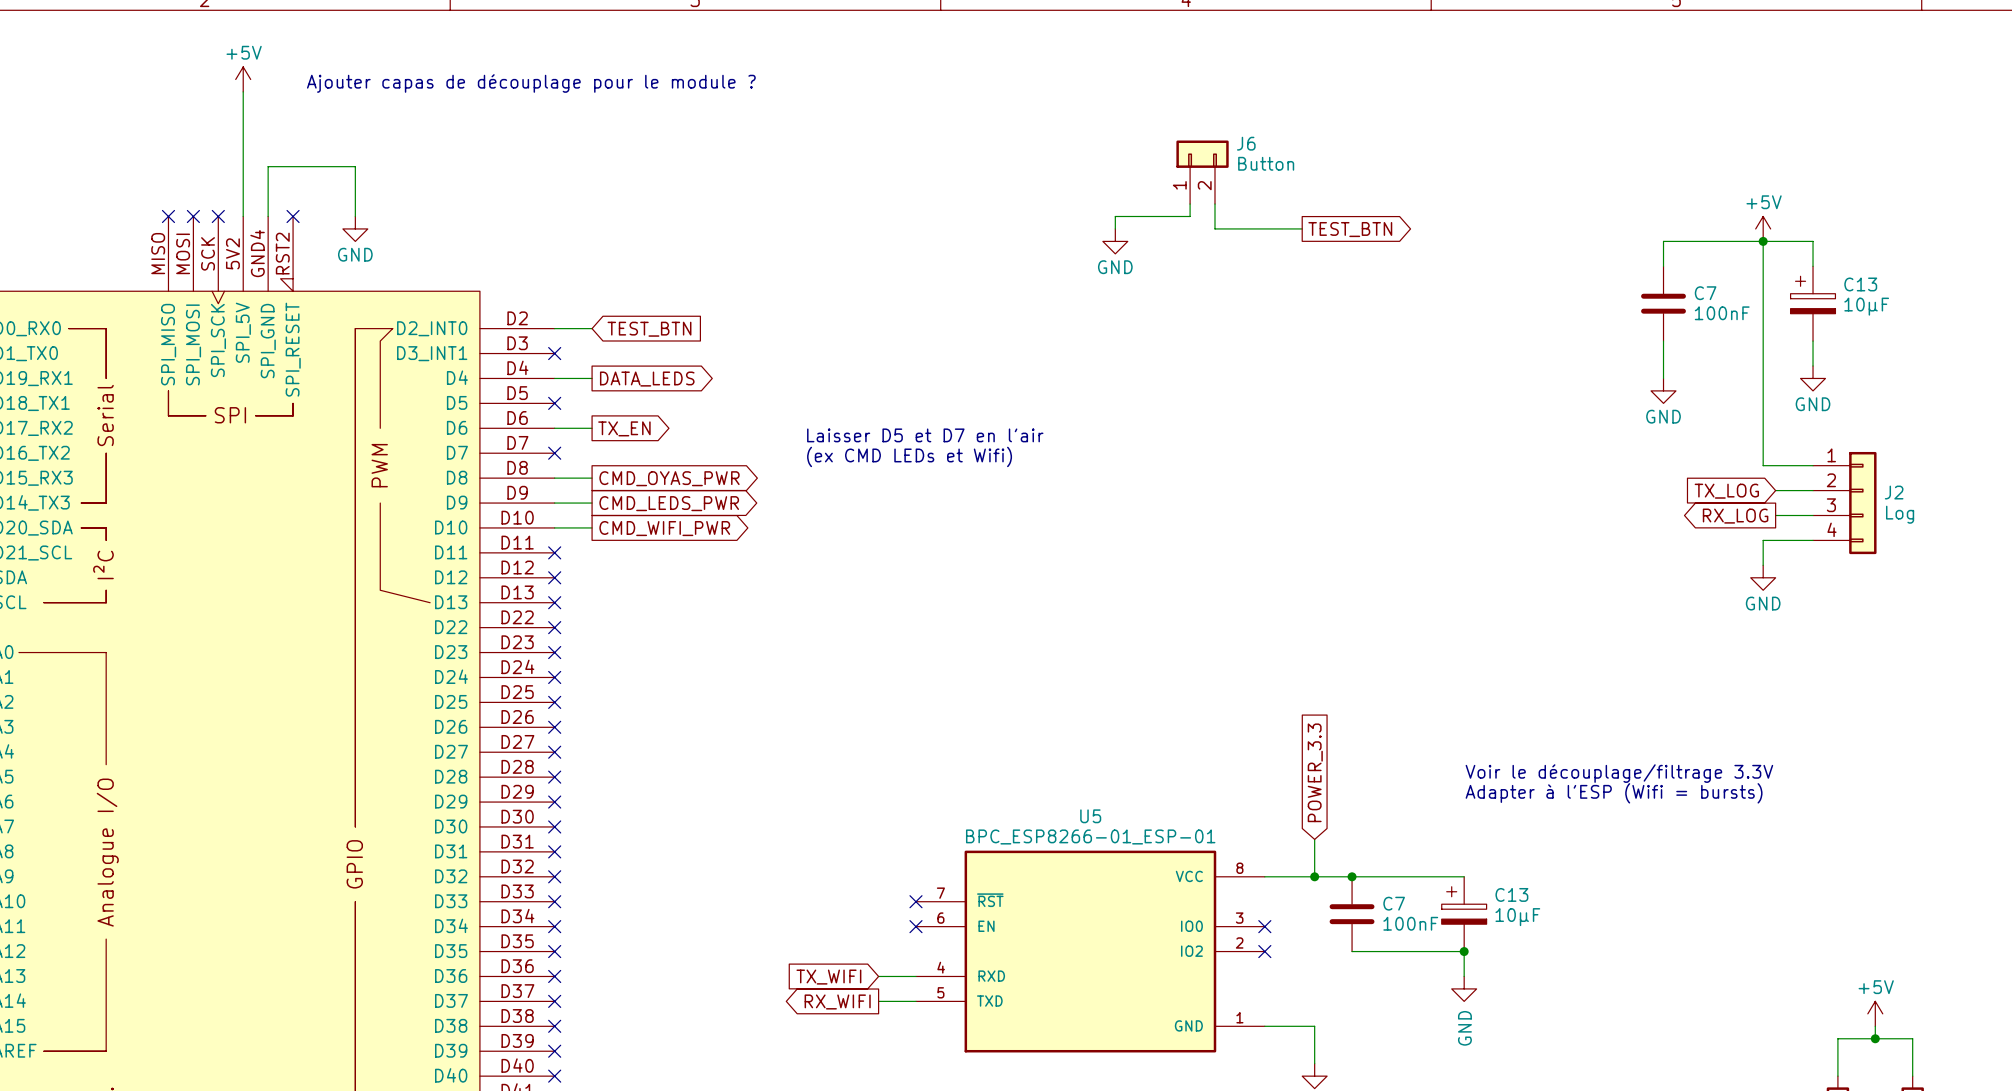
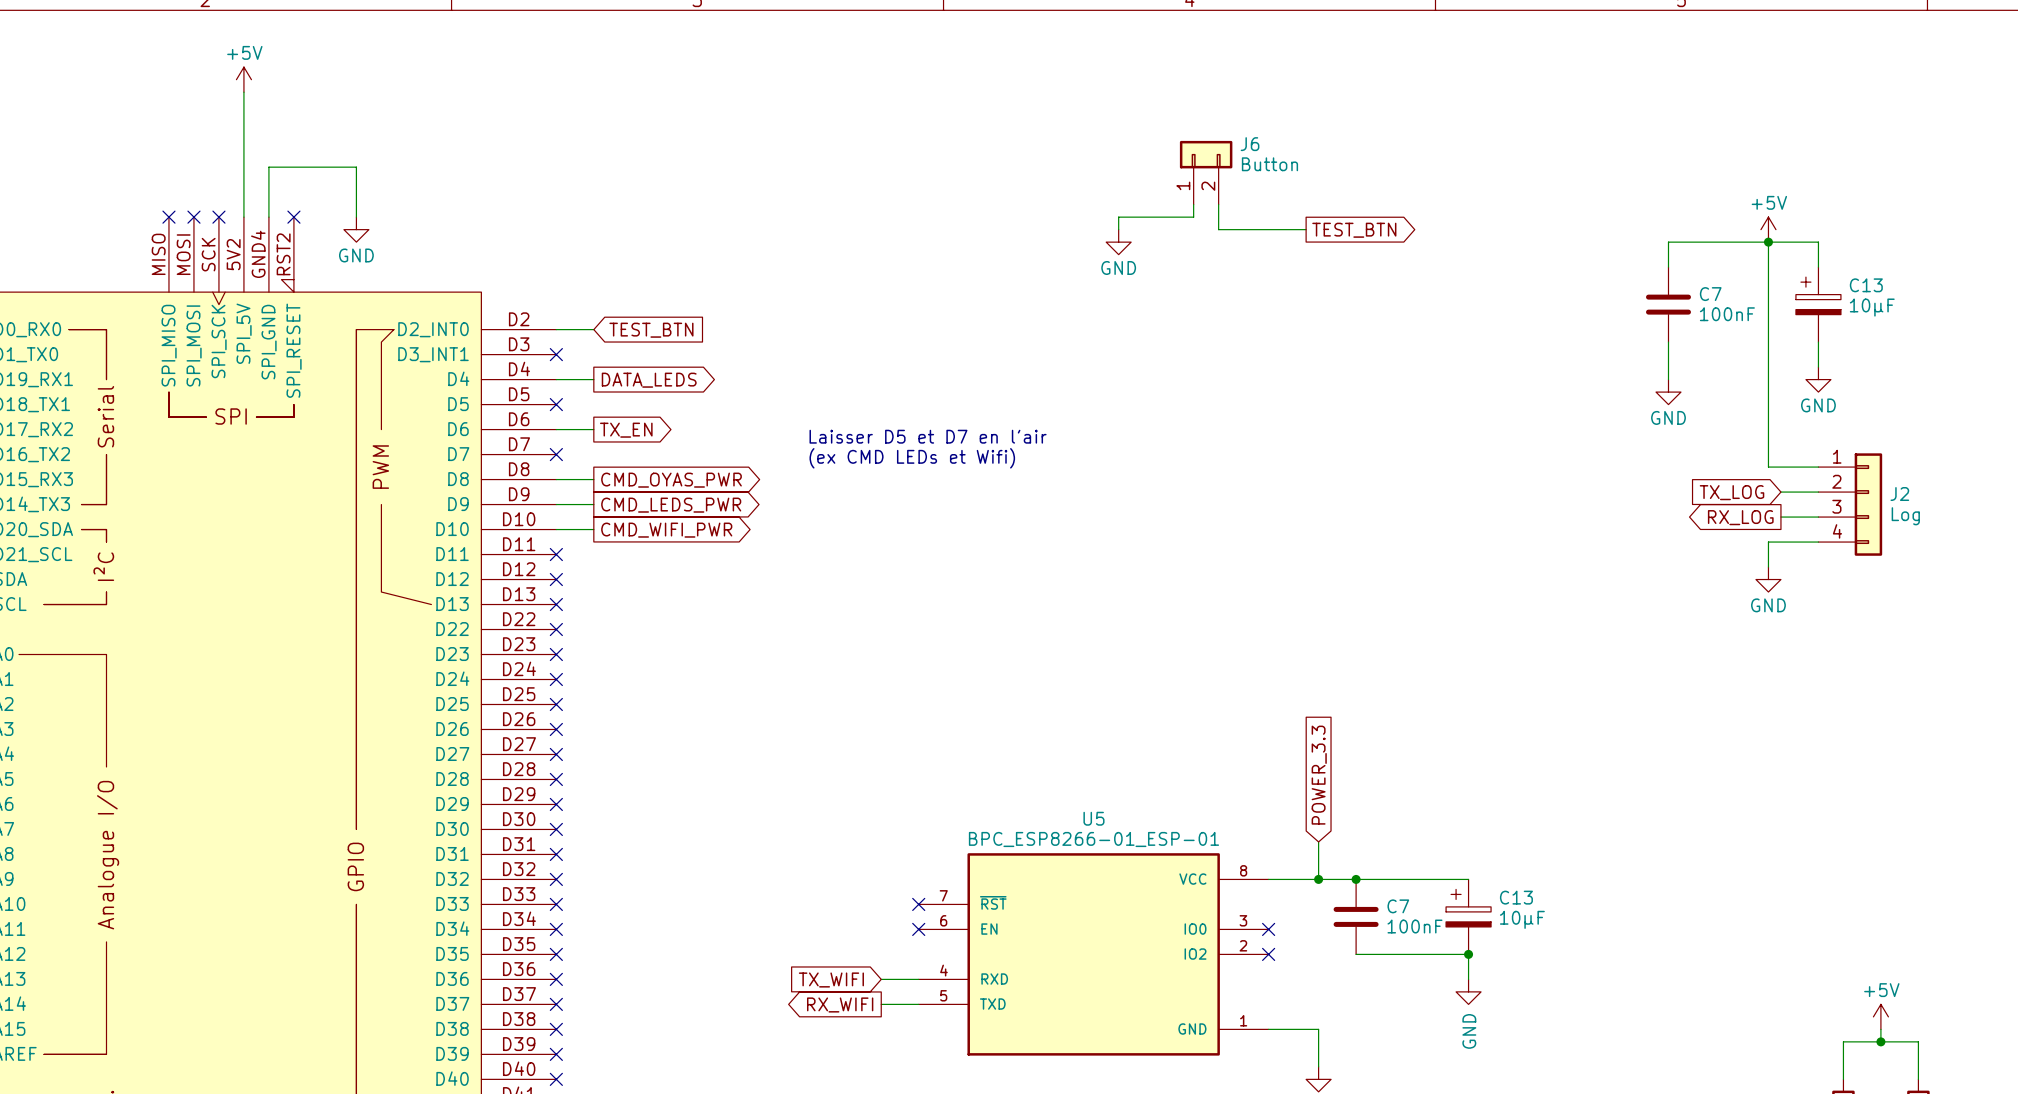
text: Ajouter capas de découplage pour le module ? (531, 83) -> none
text: Voir le découplage/filtrage 3.3V (1619, 773) -> none
text: Adapter à l'ESP (Wifi = bursts) (1614, 793) -> none

